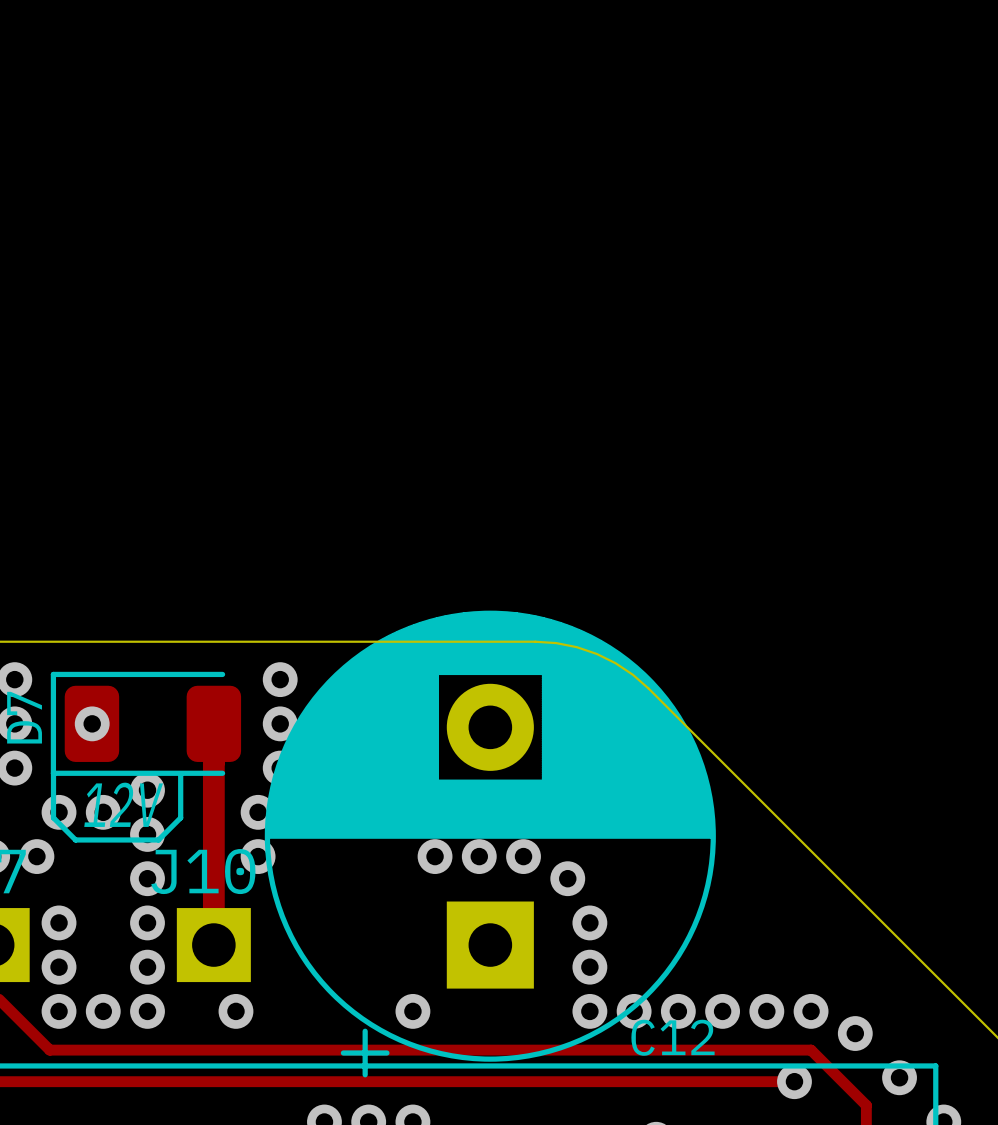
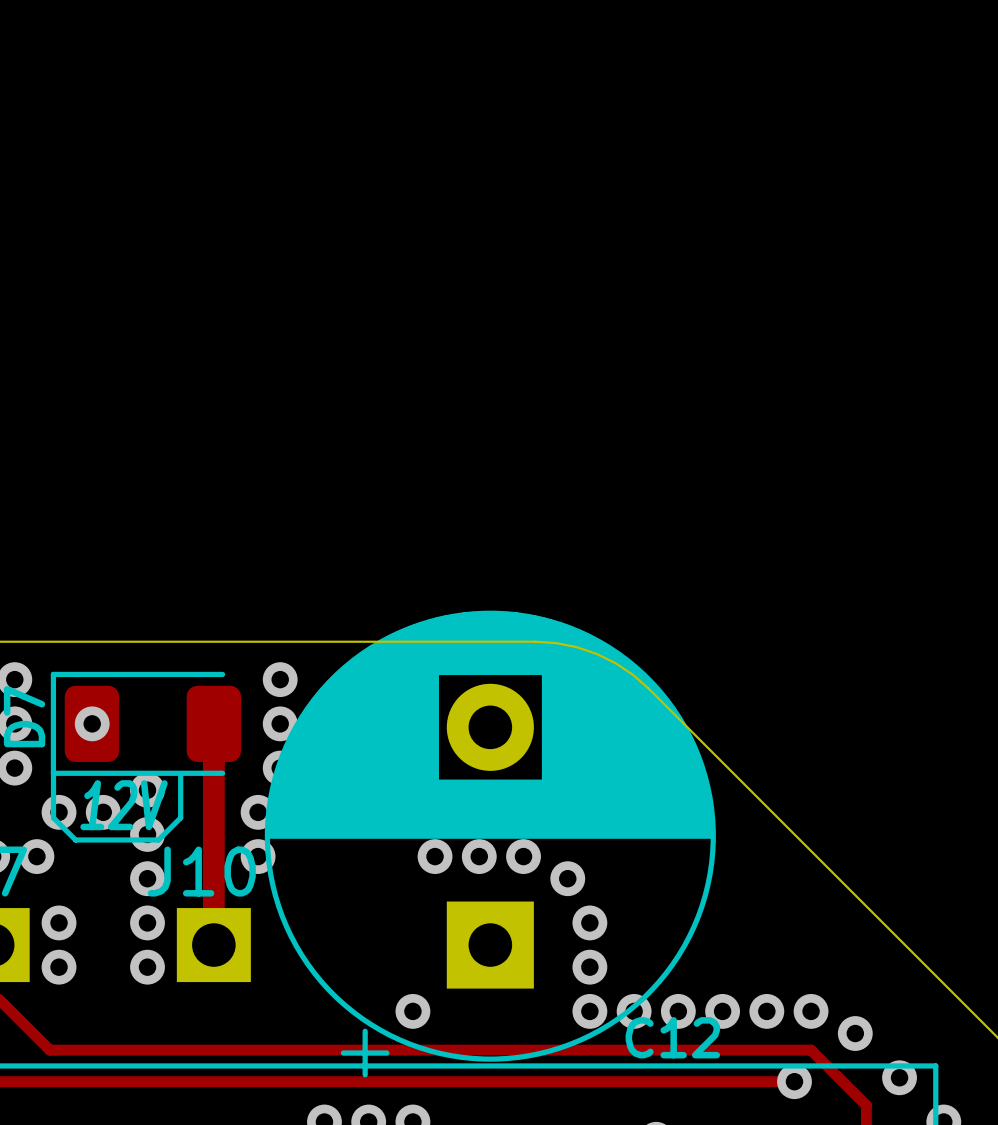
via: (59, 1011) -> none
via: (103, 1011) -> none
via: (147, 1011) -> none
via: (235, 1011) -> none

